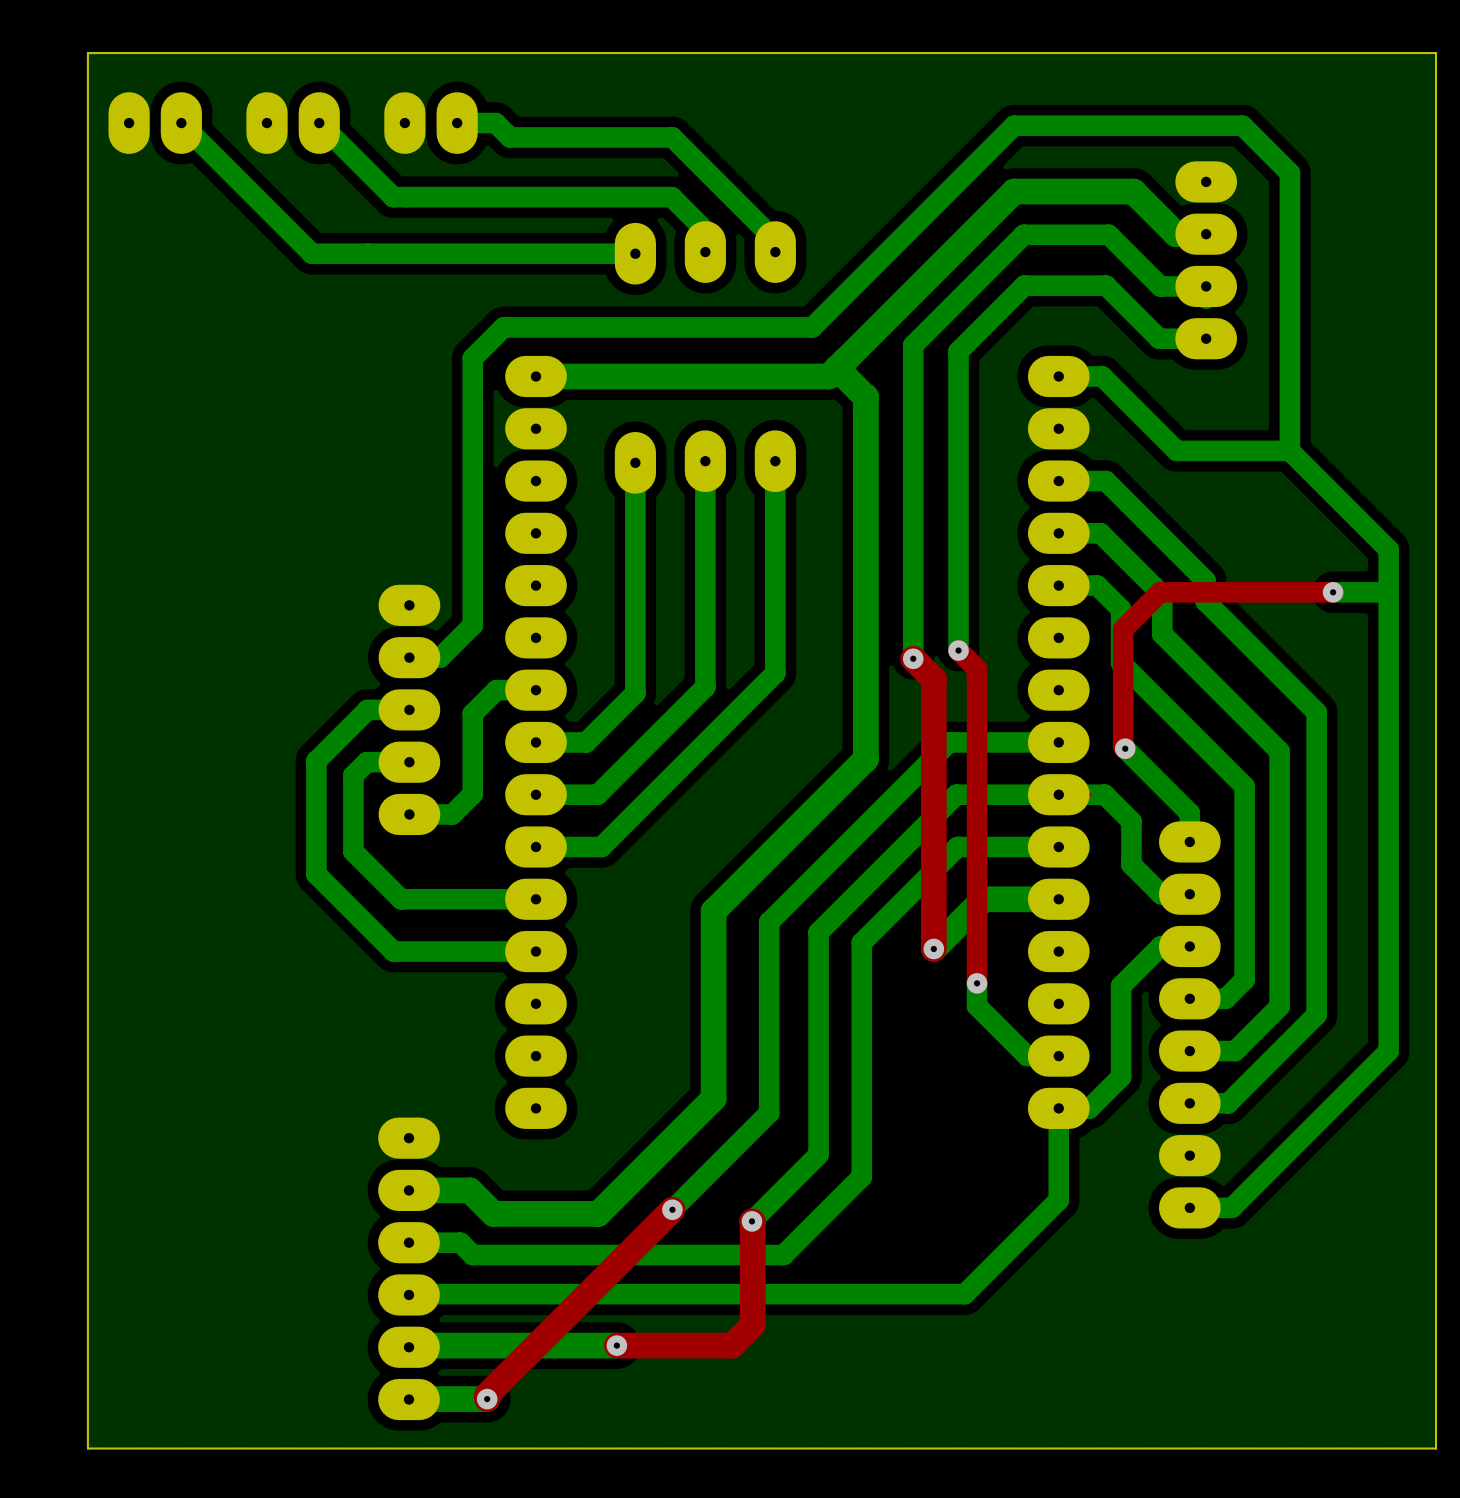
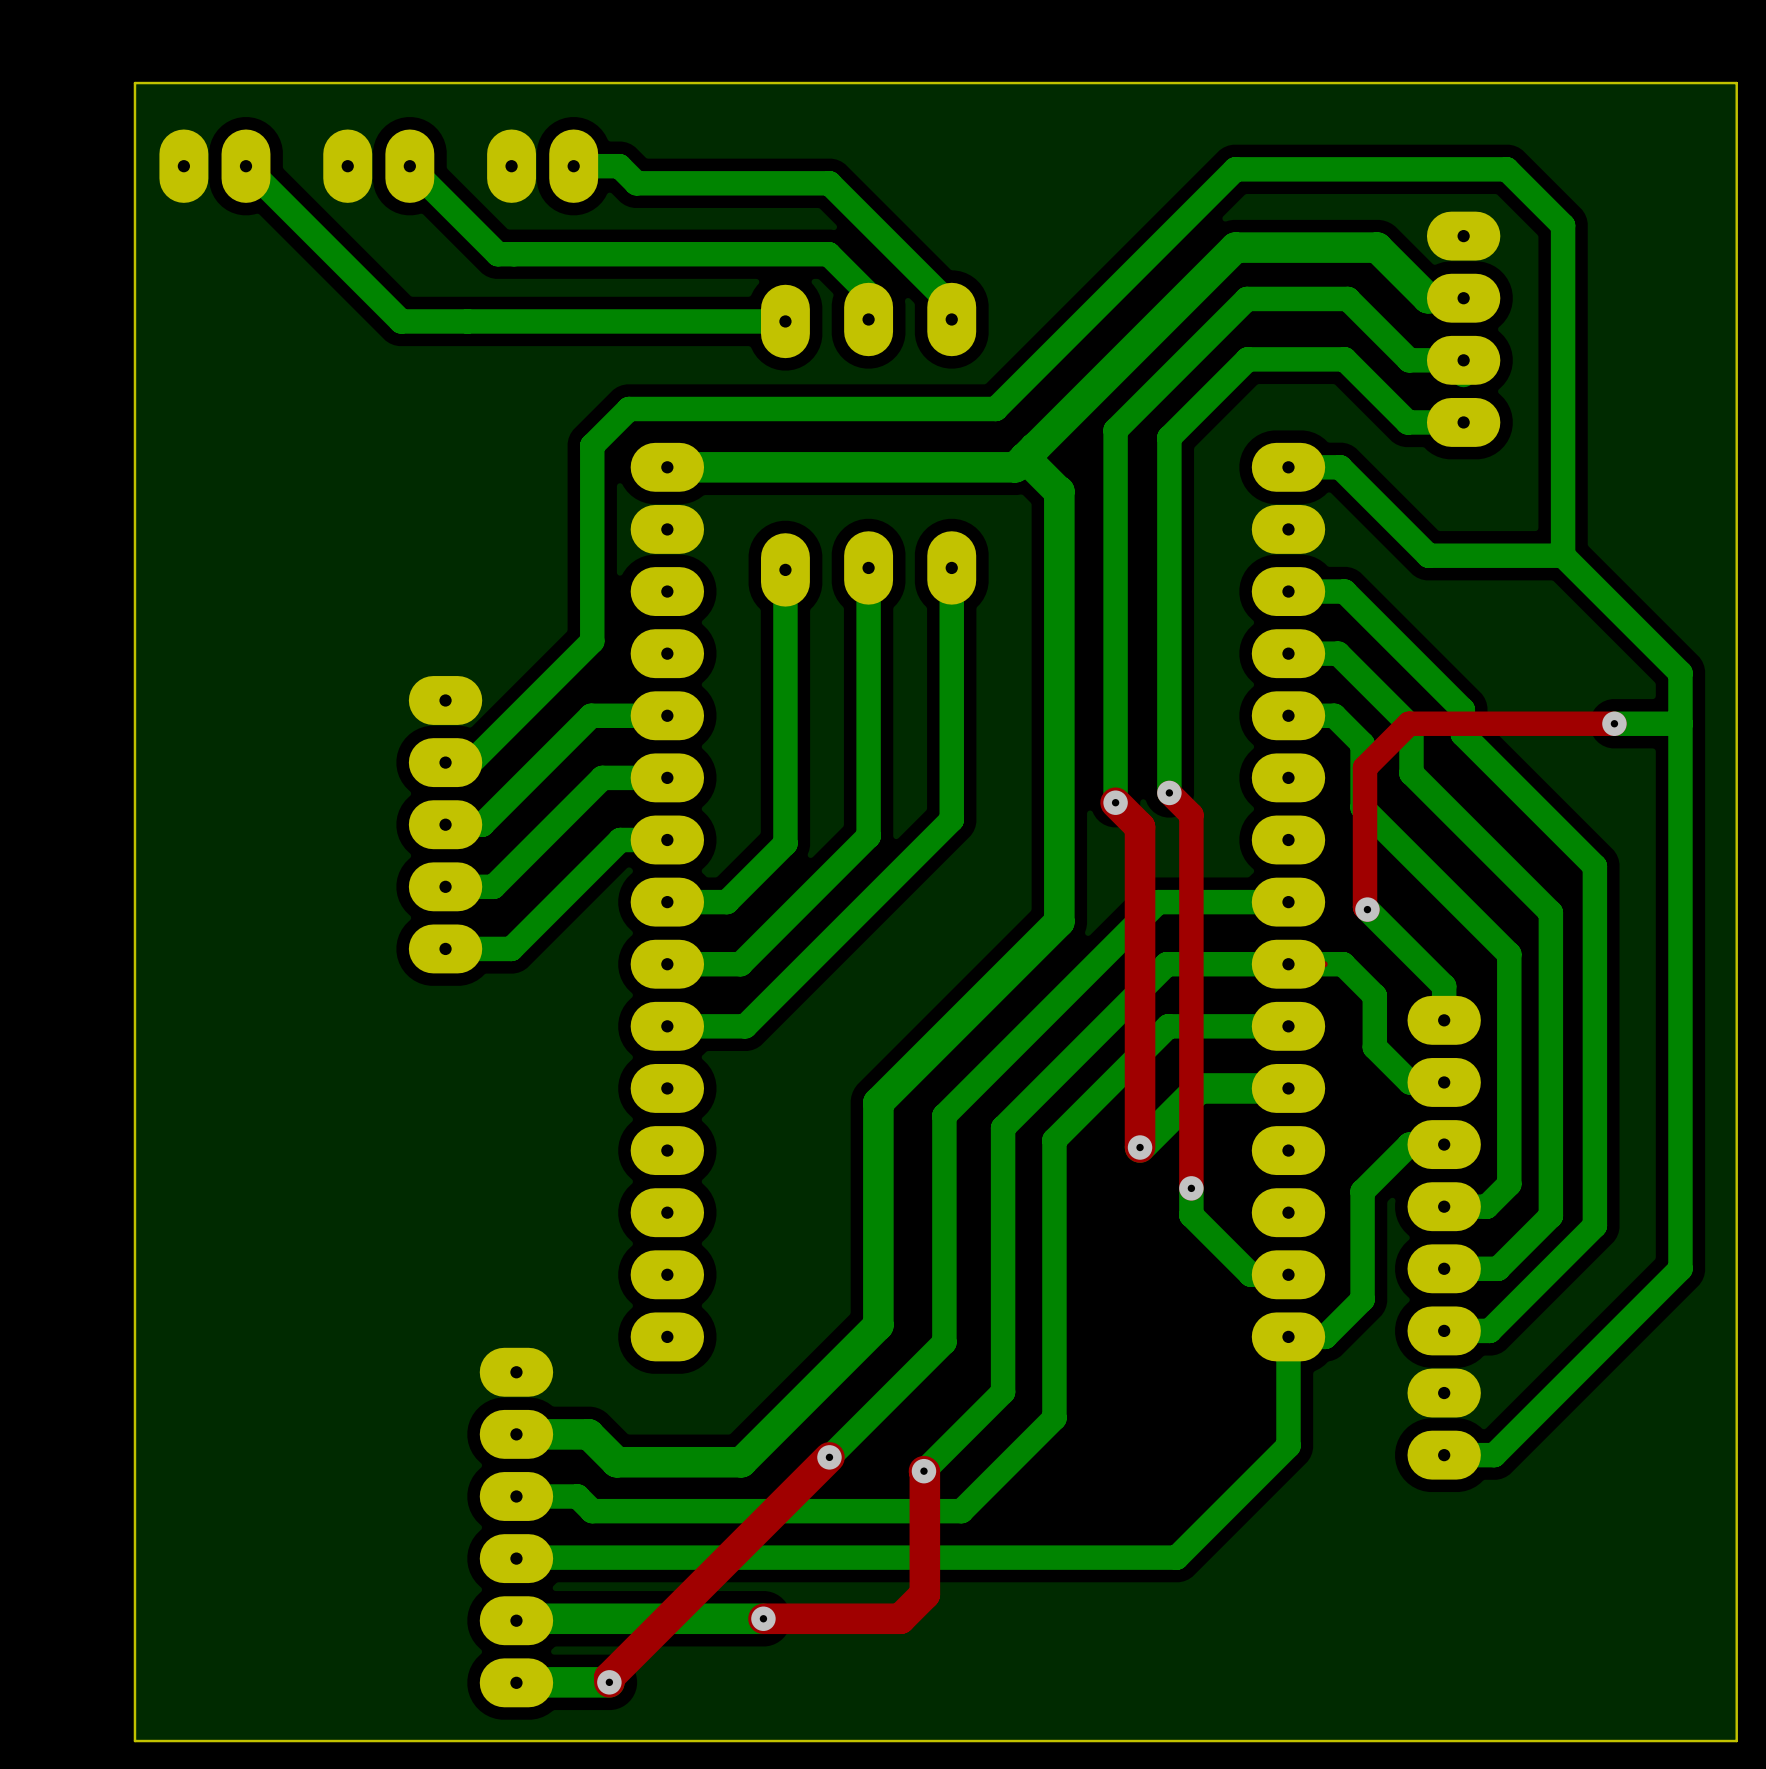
bottom track: (472, 522) (472, 625) (440, 657) (409, 657) -> (592, 641) (470, 762) (445, 762)
bottom track: none -> (667, 715) (591, 715) (482, 824) (445, 824)
bottom track: none -> (667, 777) (602, 777) (493, 886) (445, 886)
bottom track: (409, 709) (367, 709) (316, 761) (316, 874) (393, 951) (536, 951) -> none
part position: (409, 709) -> (445, 824)
bottom track: (472, 713) (472, 794) (452, 814) (409, 814) -> (592, 868) (511, 948) (445, 948)
bottom track: (409, 762) (366, 762) (353, 775) (353, 851) (401, 899) (536, 899) -> none

